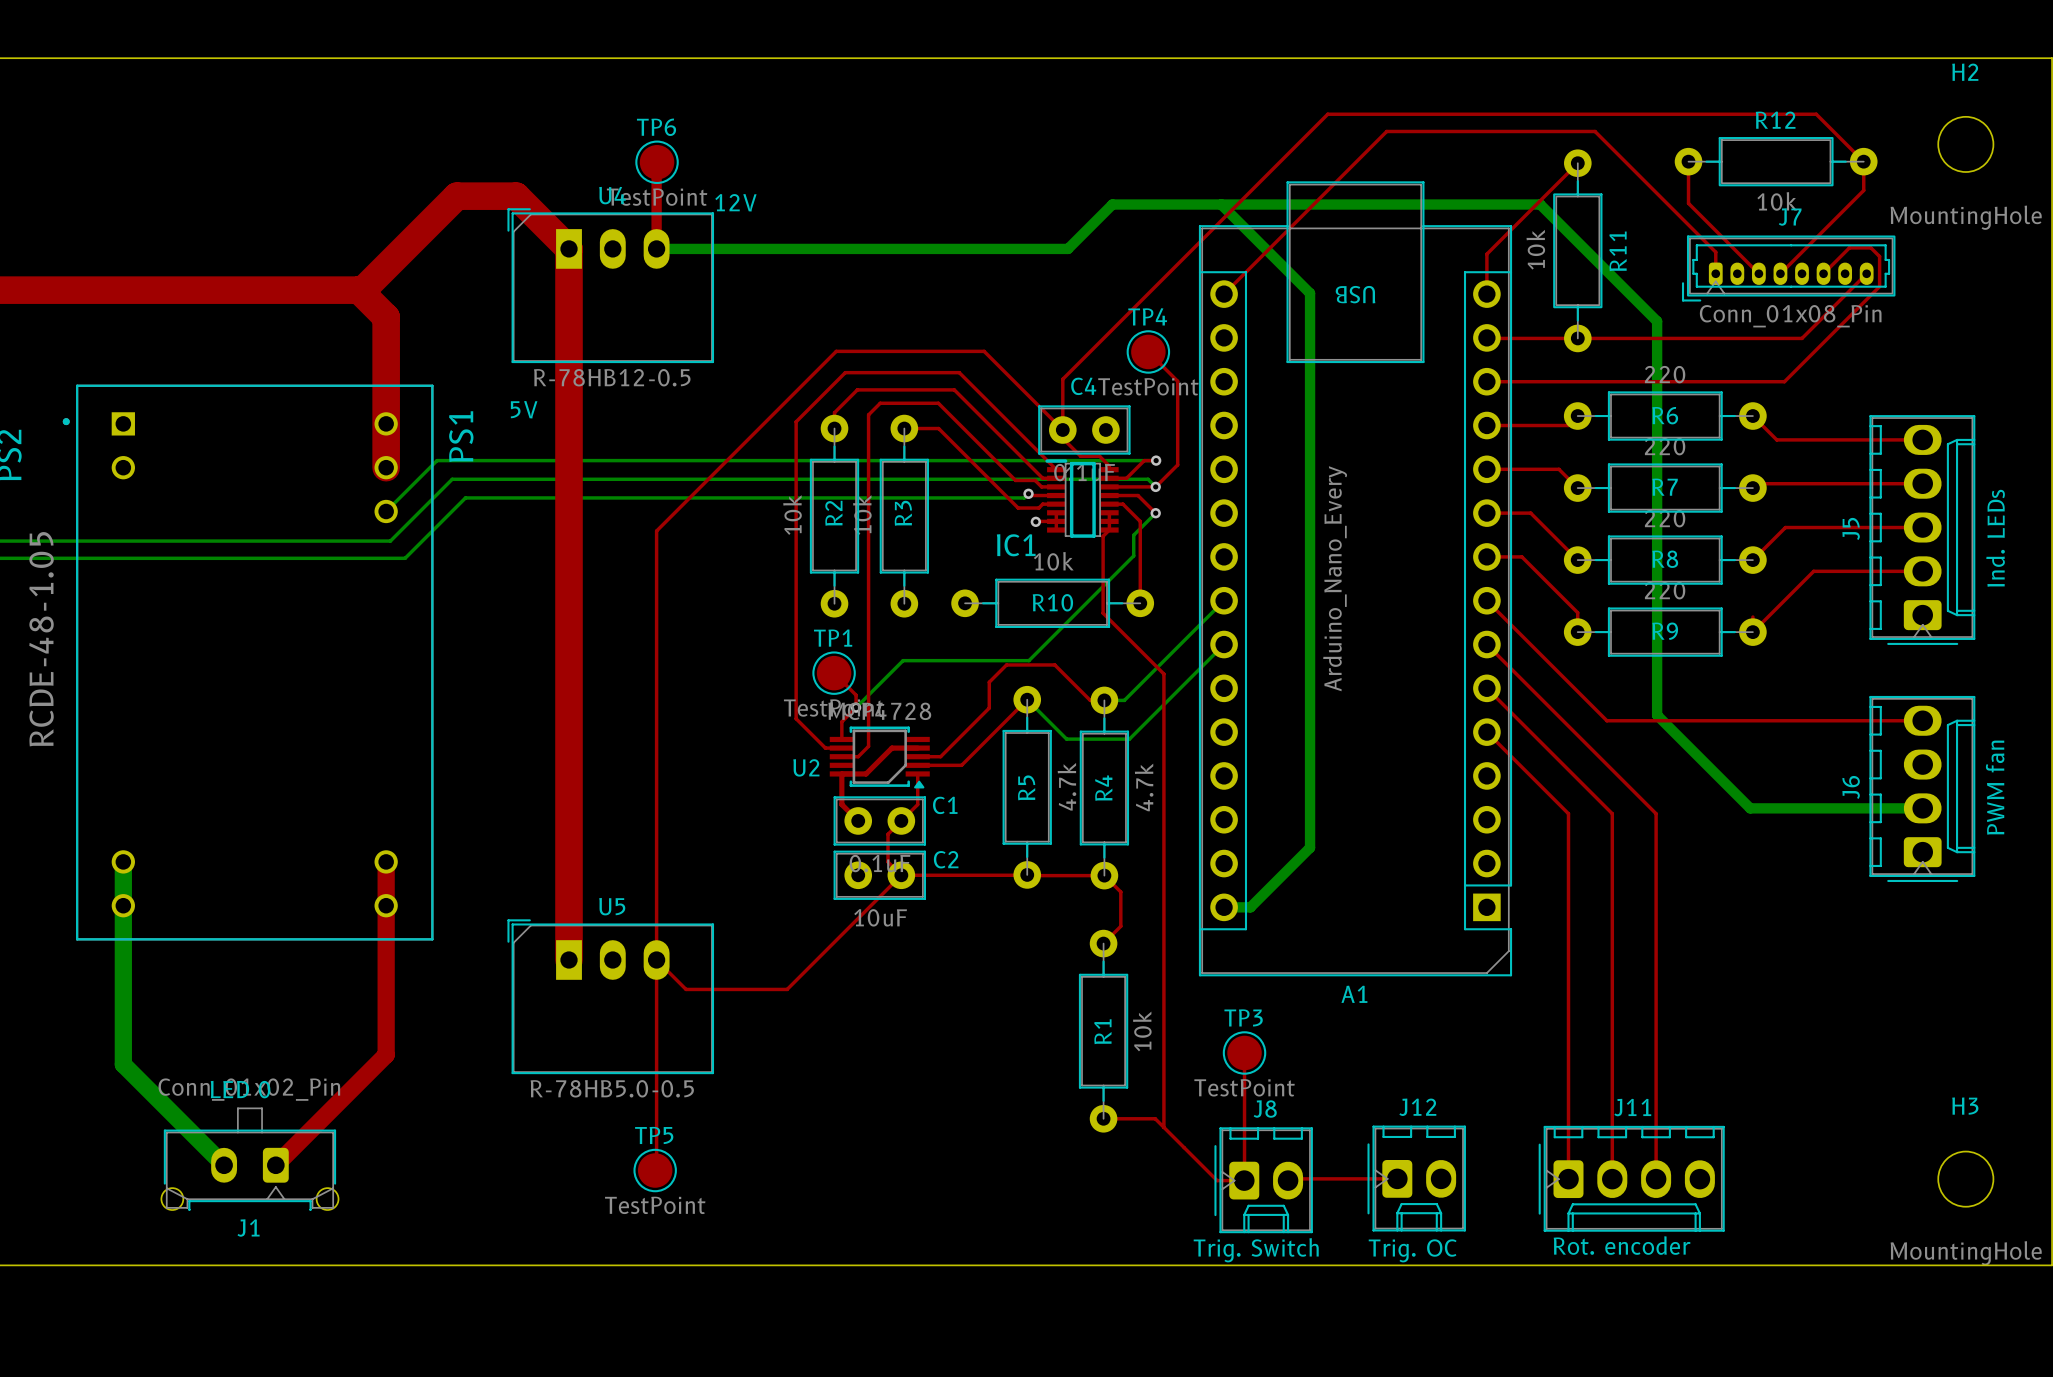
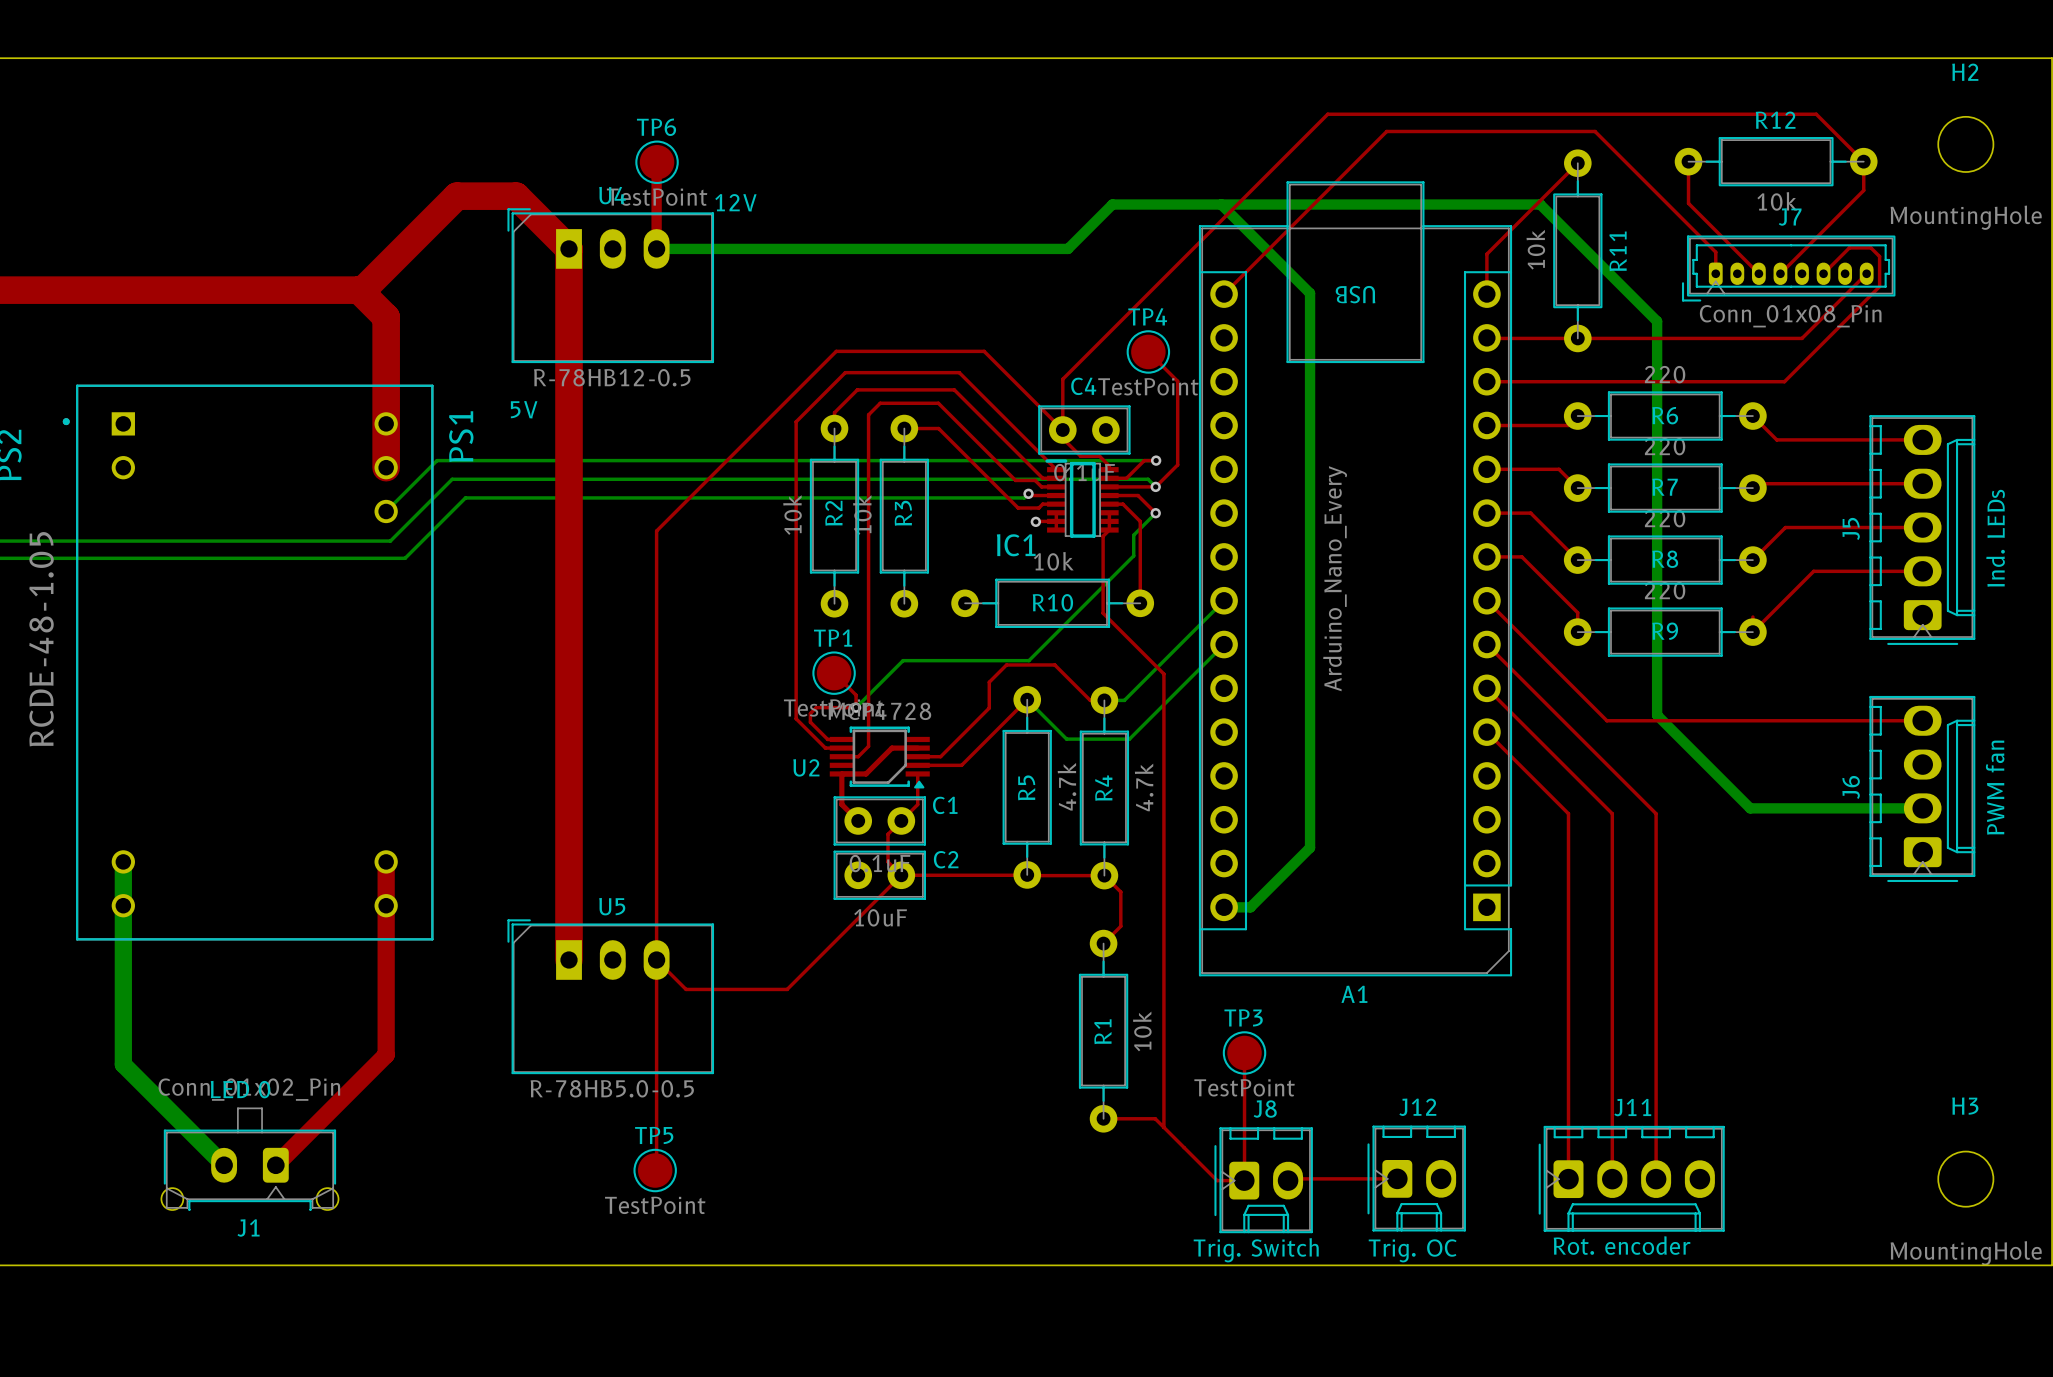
top track: (856, 707) (841, 721) (841, 739) -> (856, 707) (816, 707) (810, 713) (810, 722) (827, 739) (841, 739)

